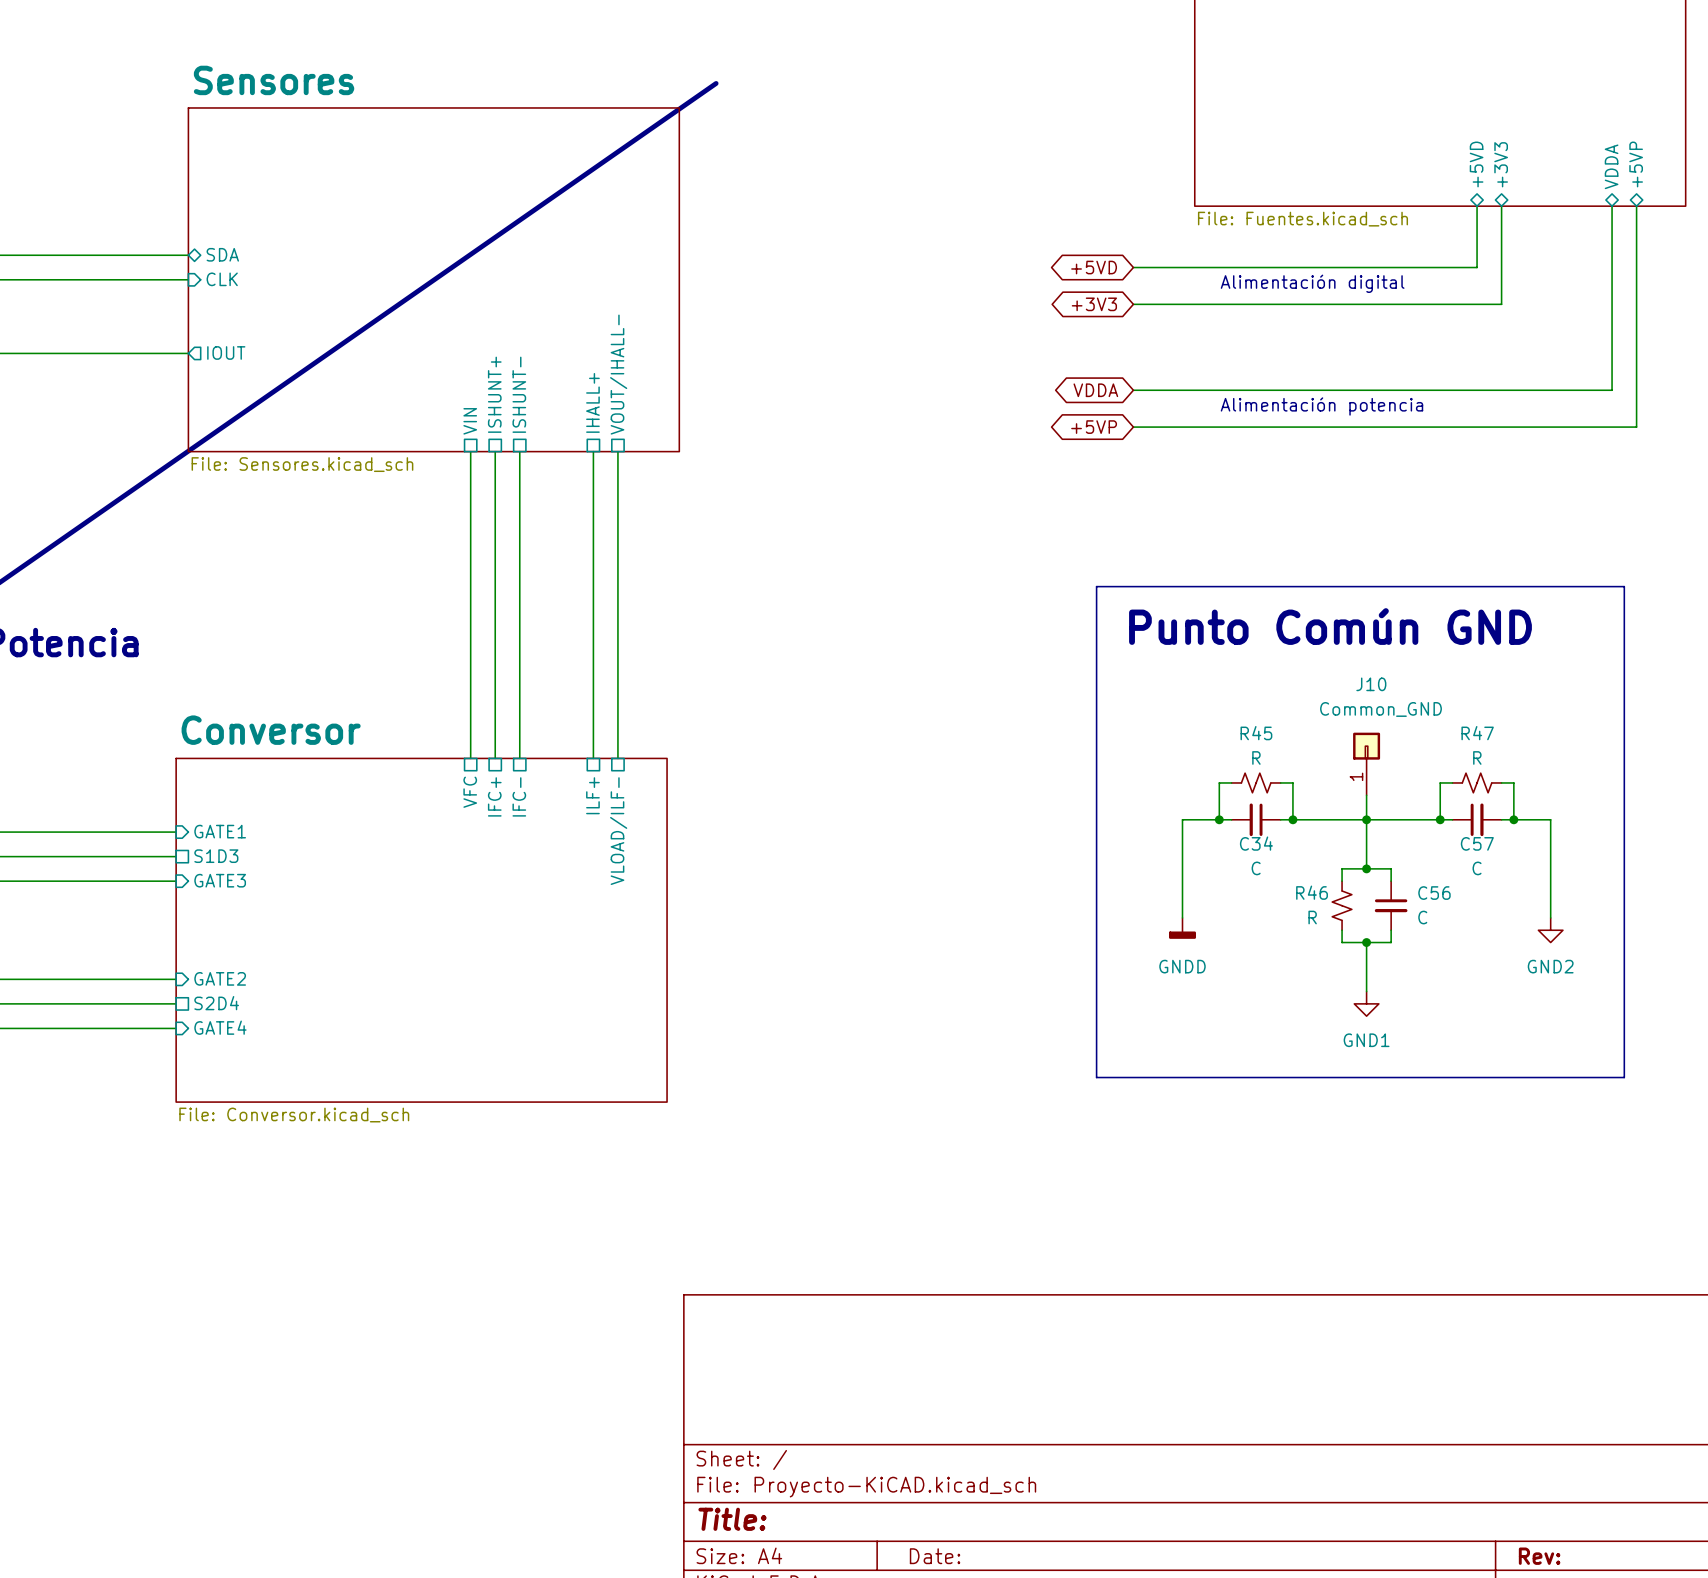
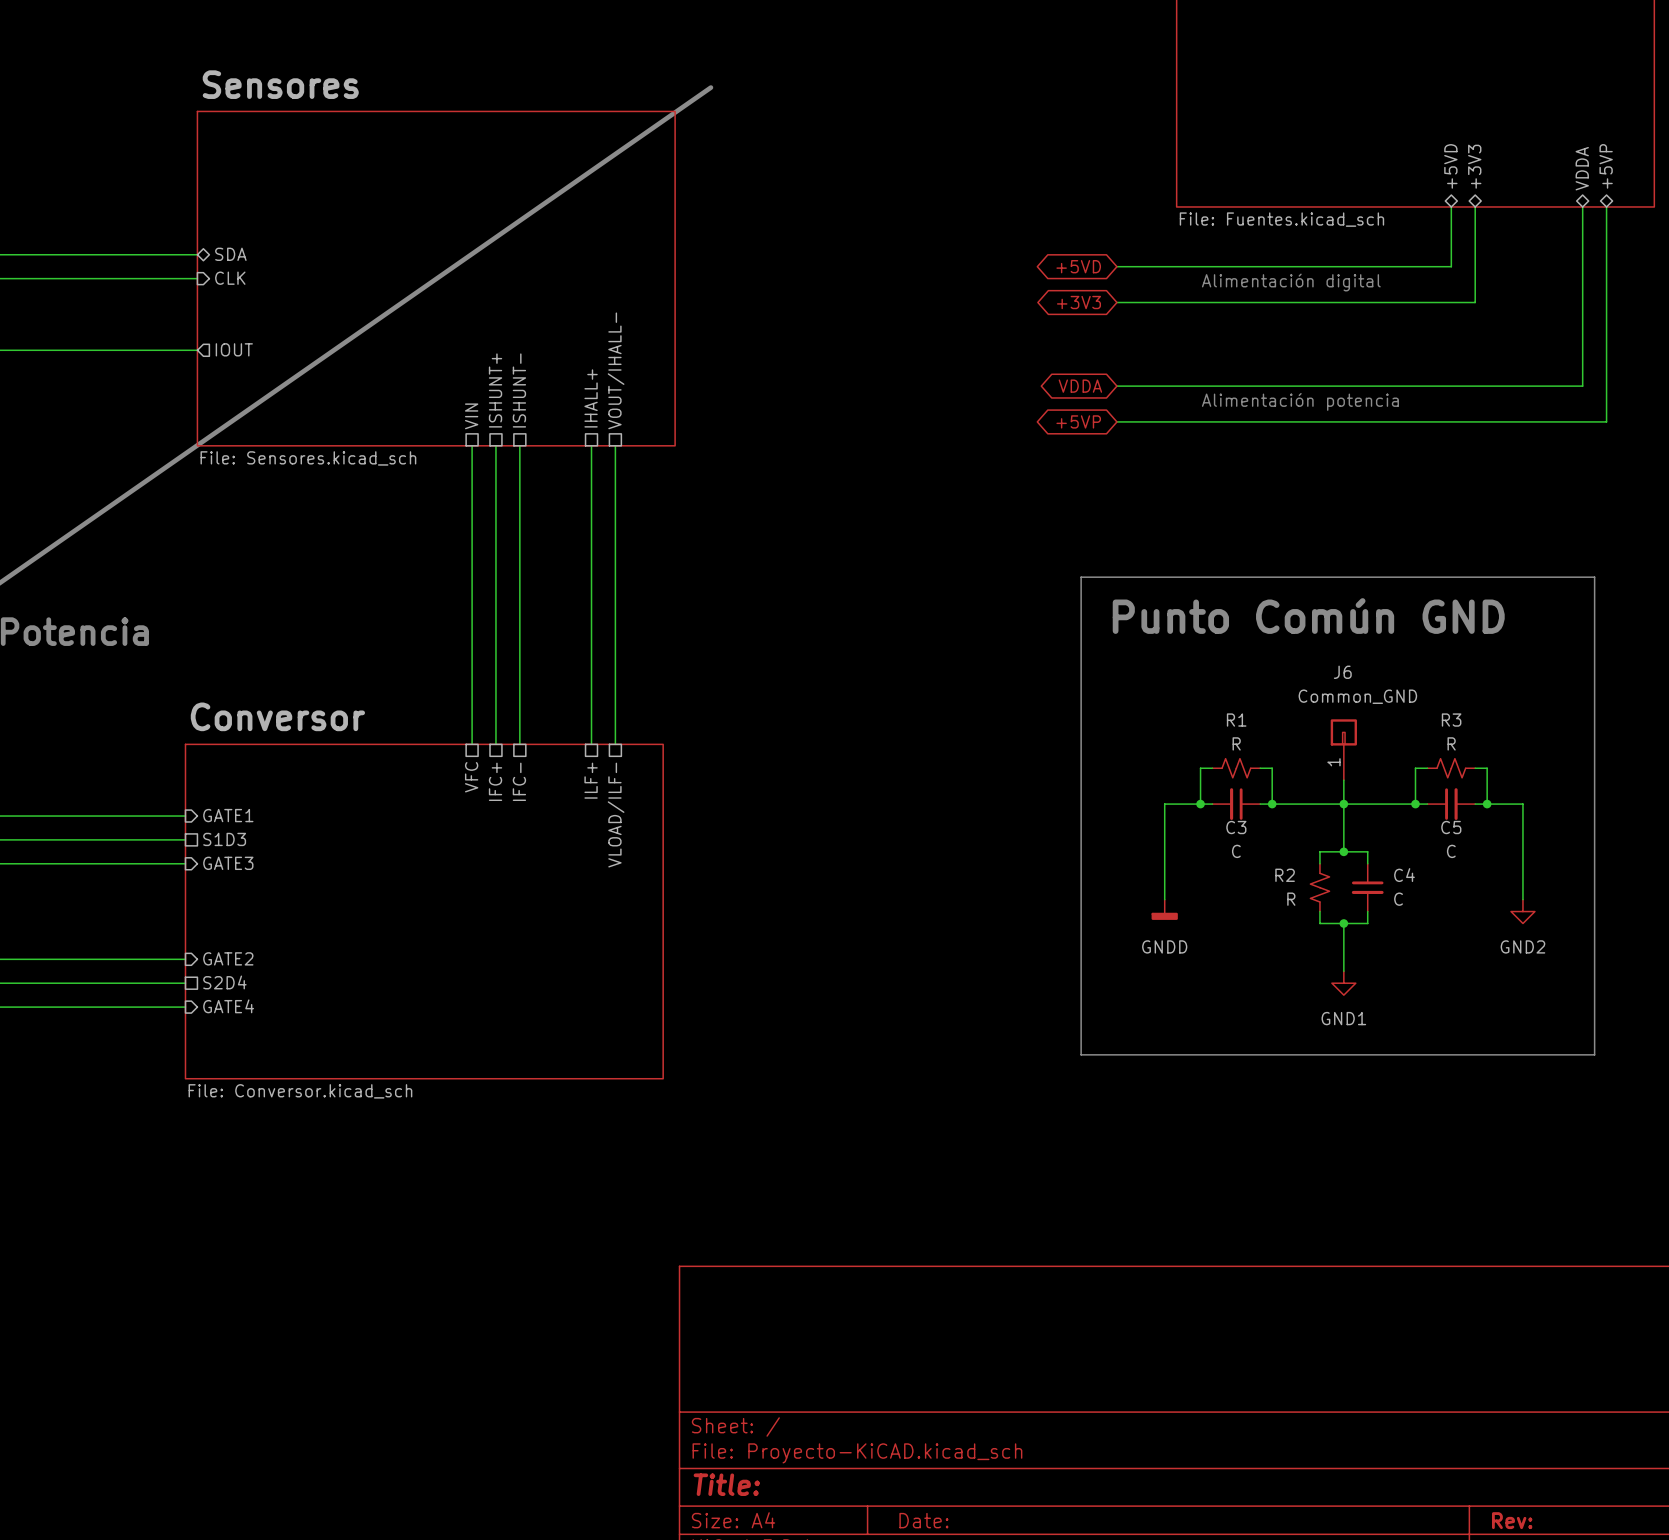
J10 name: J10 (1371, 684) -> J6 (1342, 672)
R45 name: R45 (1256, 733) -> R1 (1236, 720)
R47 name: R47 (1477, 733) -> R3 (1451, 720)
C34 name: C34 (1256, 843) -> C3 (1236, 827)
C57 name: C57 (1477, 843) -> C5 (1451, 827)
R46 name: R46 (1312, 892) -> R2 (1285, 875)
C56 name: C56 (1434, 893) -> C4 (1404, 875)

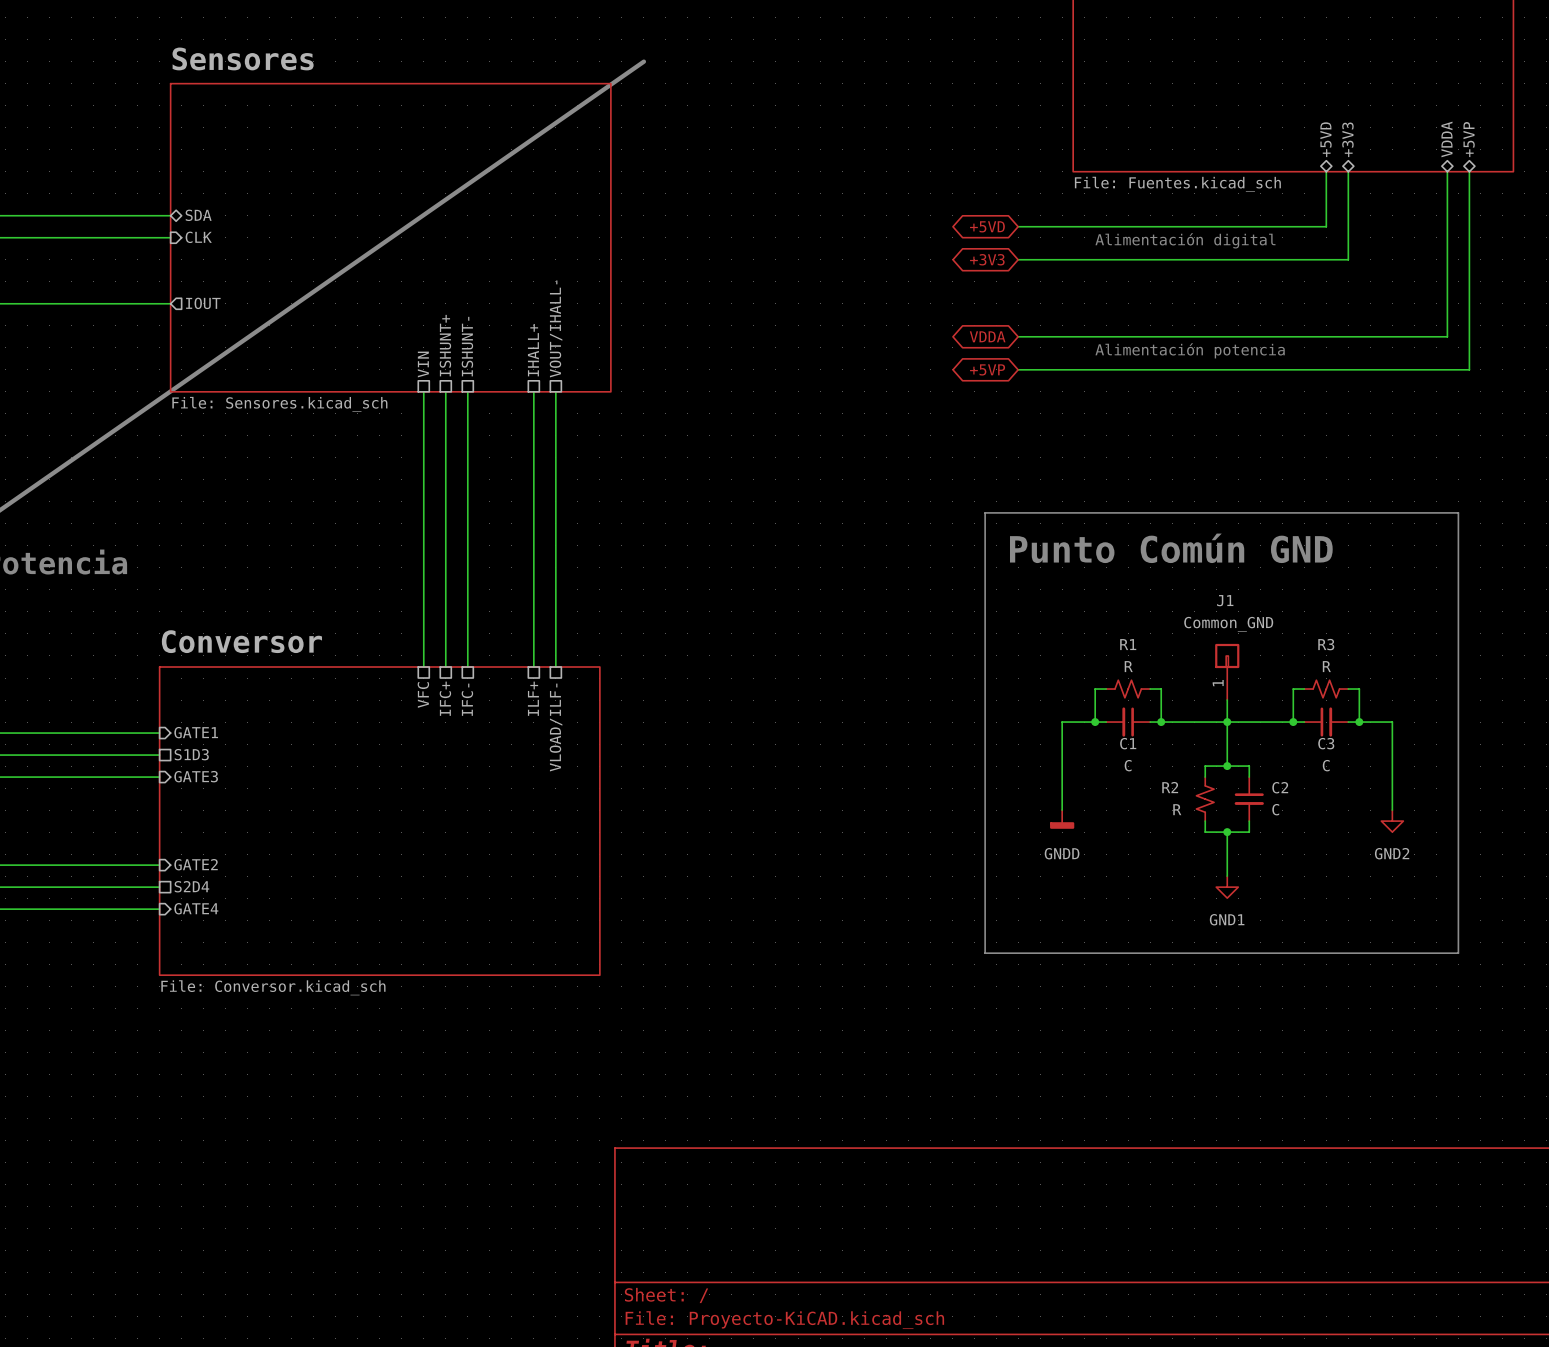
J6 name: J6 (1342, 672) -> J1 (1225, 600)
C3 name: C3 (1236, 827) -> C1 (1128, 743)
C5 name: C5 (1451, 827) -> C3 (1326, 743)
C4 name: C4 (1404, 875) -> C2 (1280, 787)

